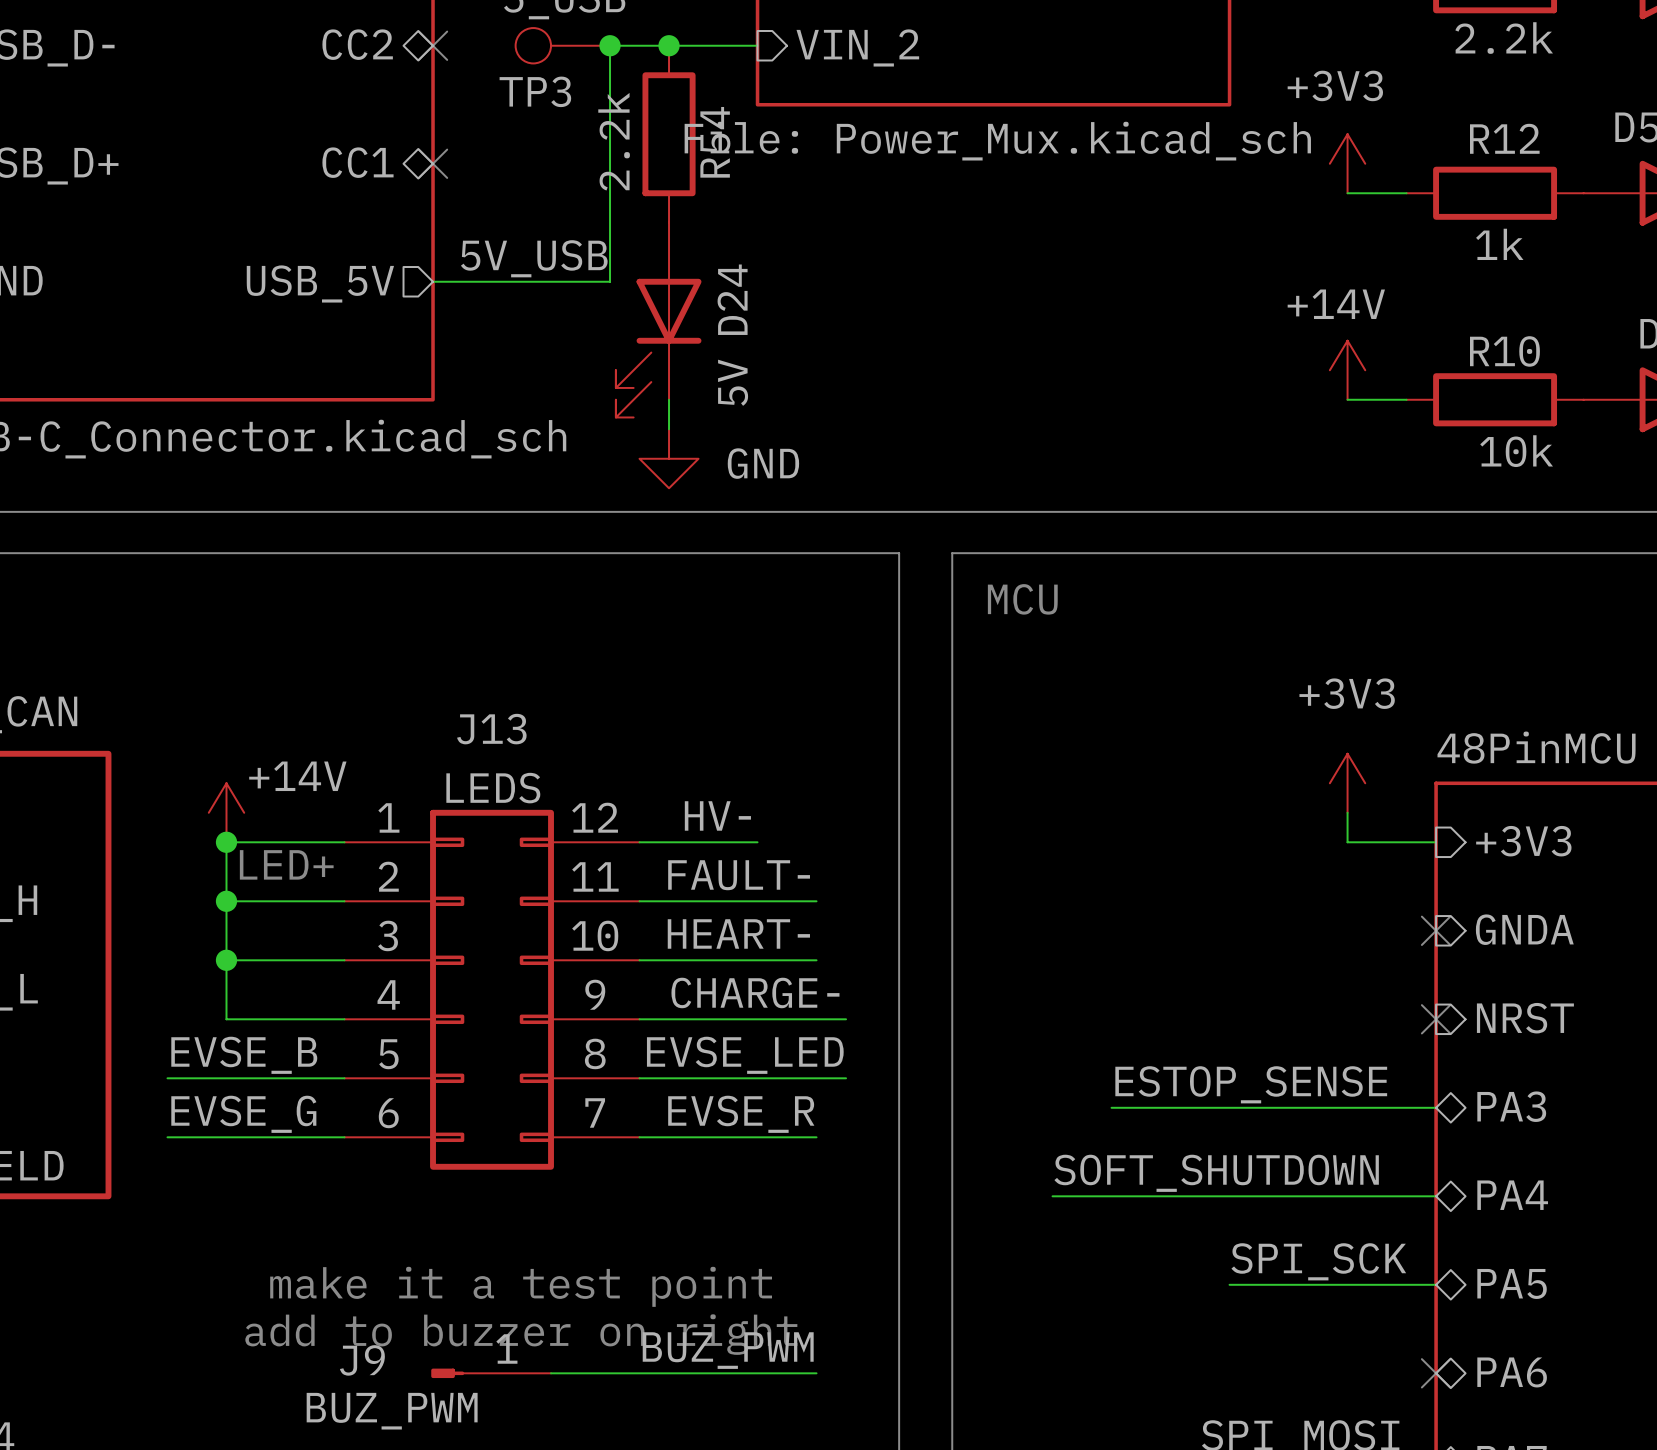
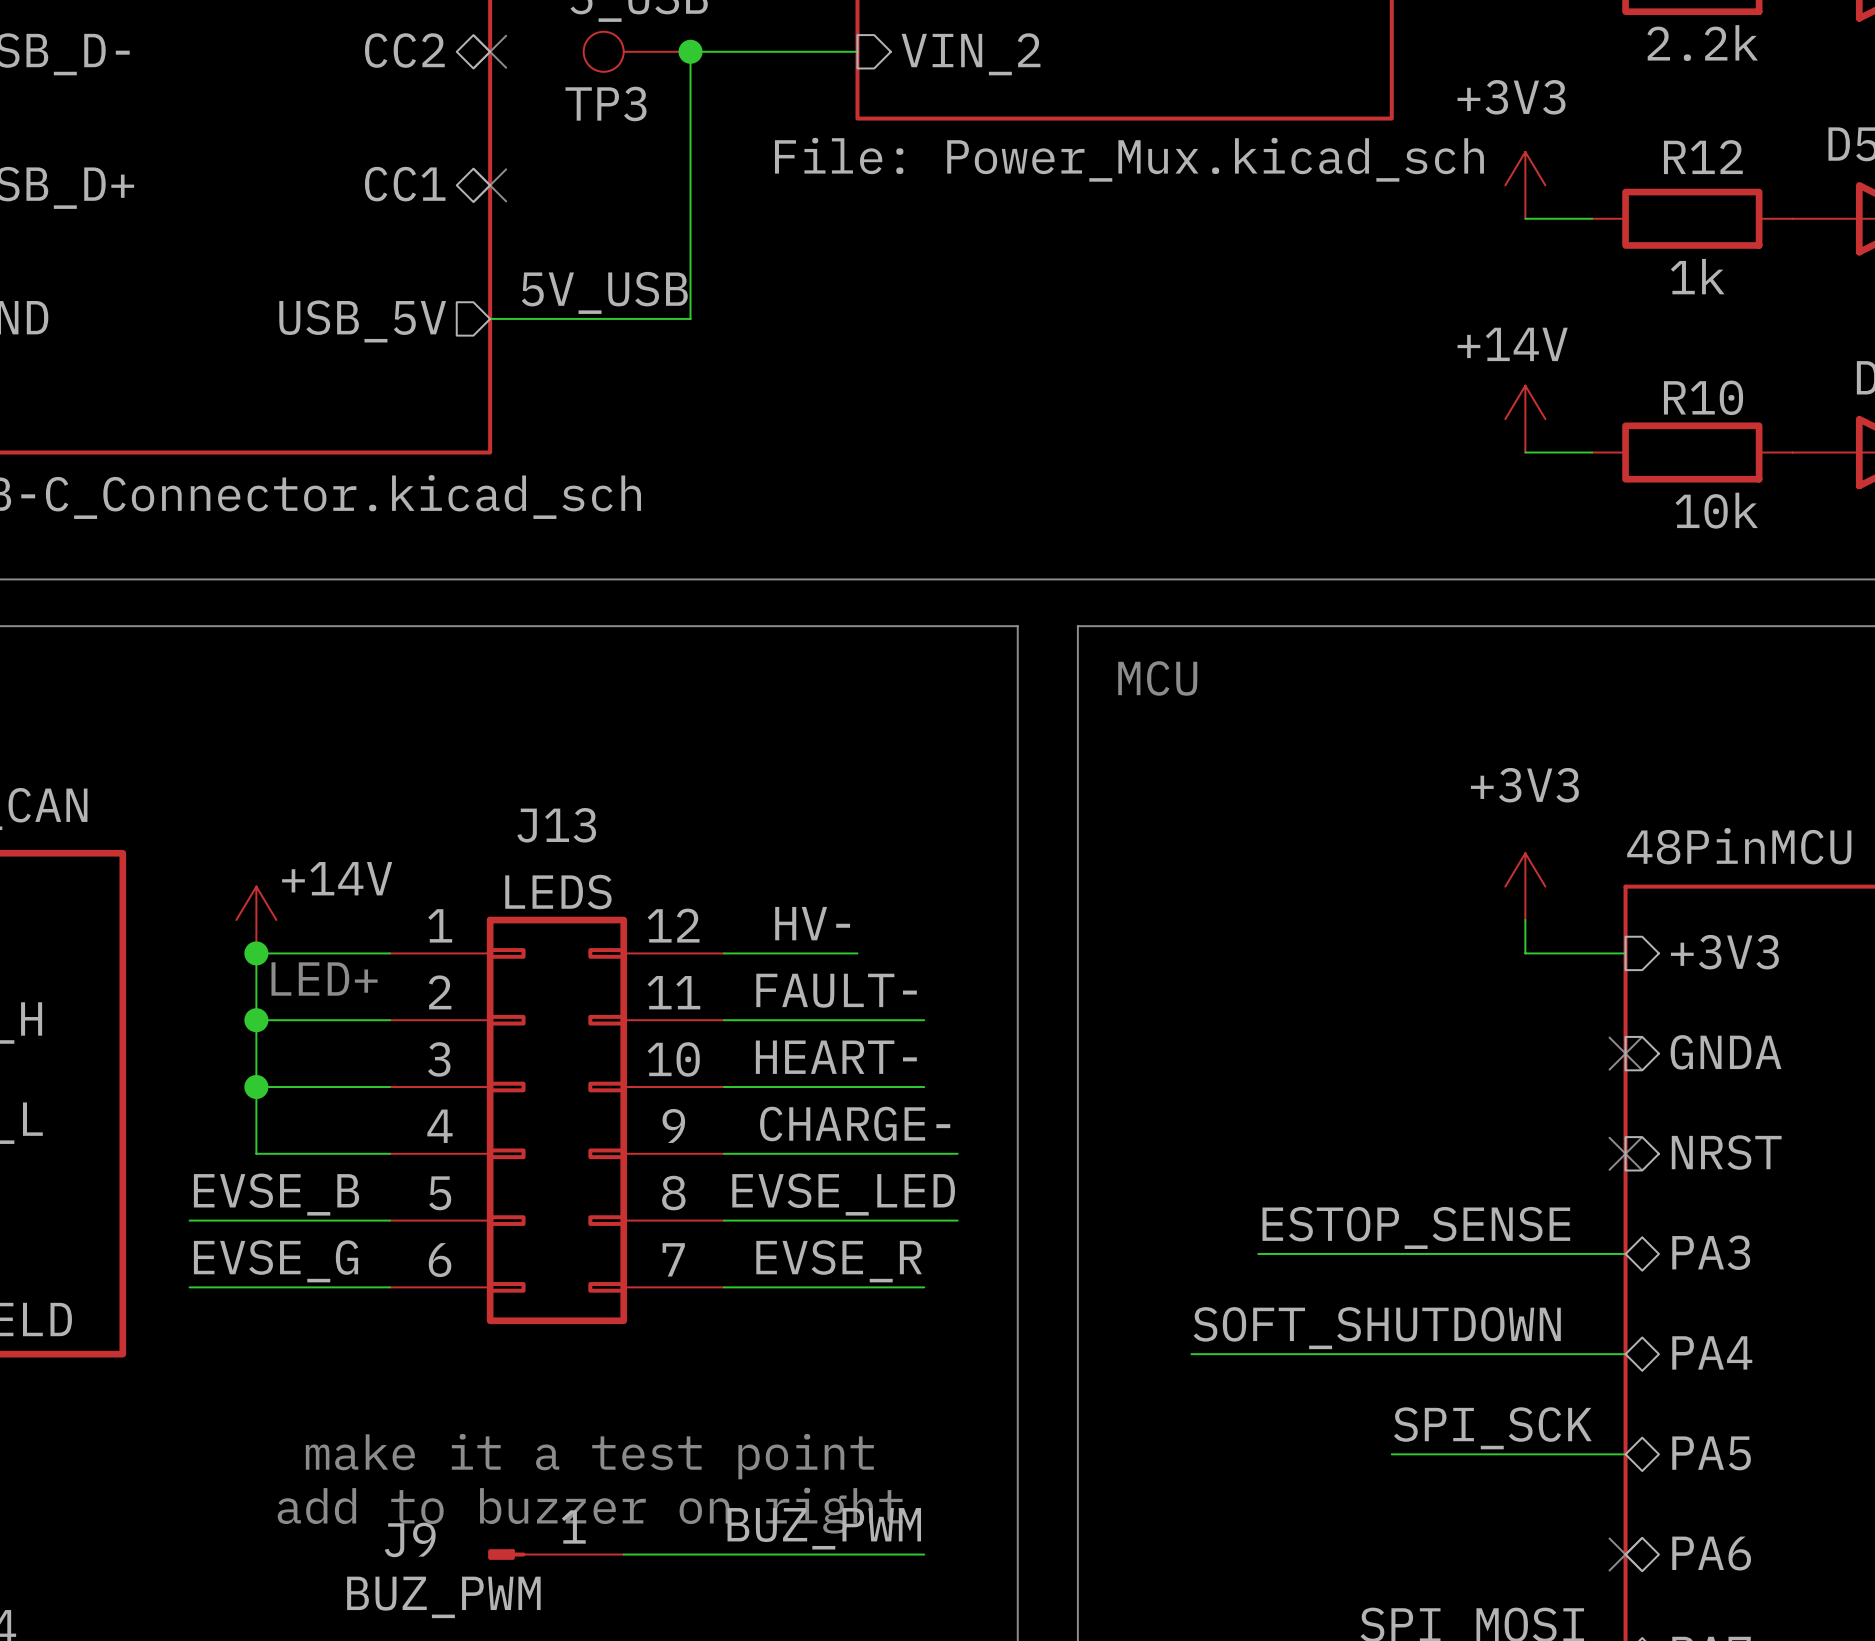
junction: (669, 45) -> none
R54: 2.2k (669, 134) -> none
D24: 5V (658, 320) -> none
wire: (669, 399) (669, 429) -> none
power symbol: GND (669, 458) -> none

